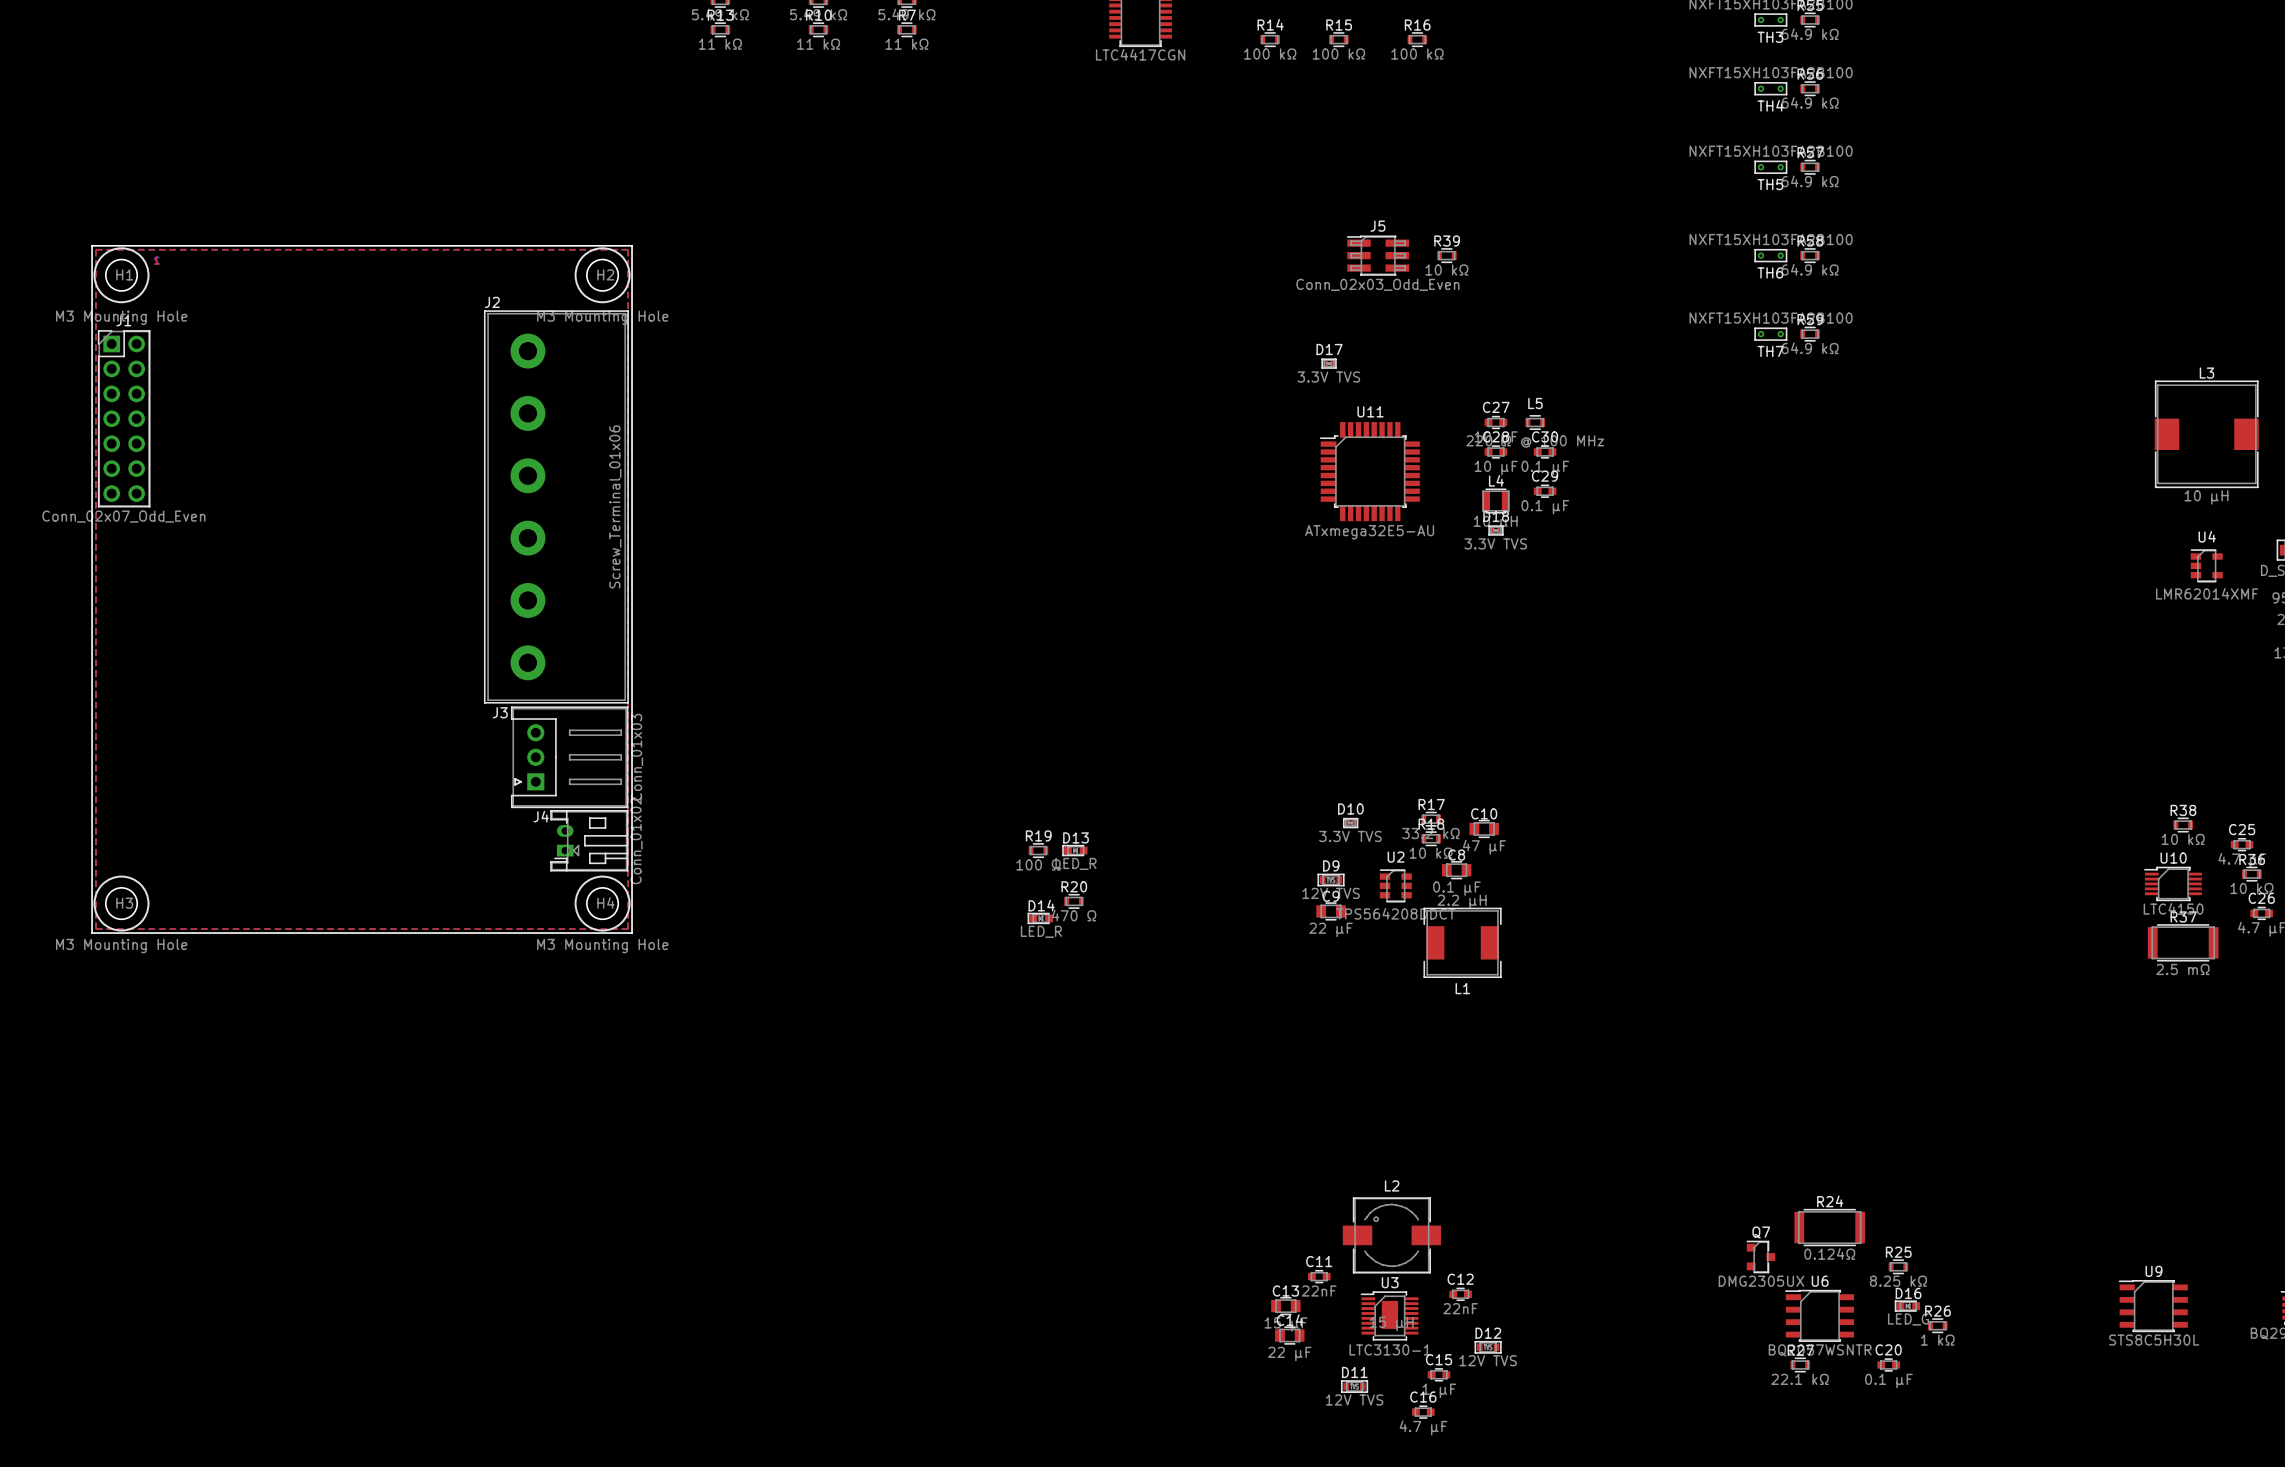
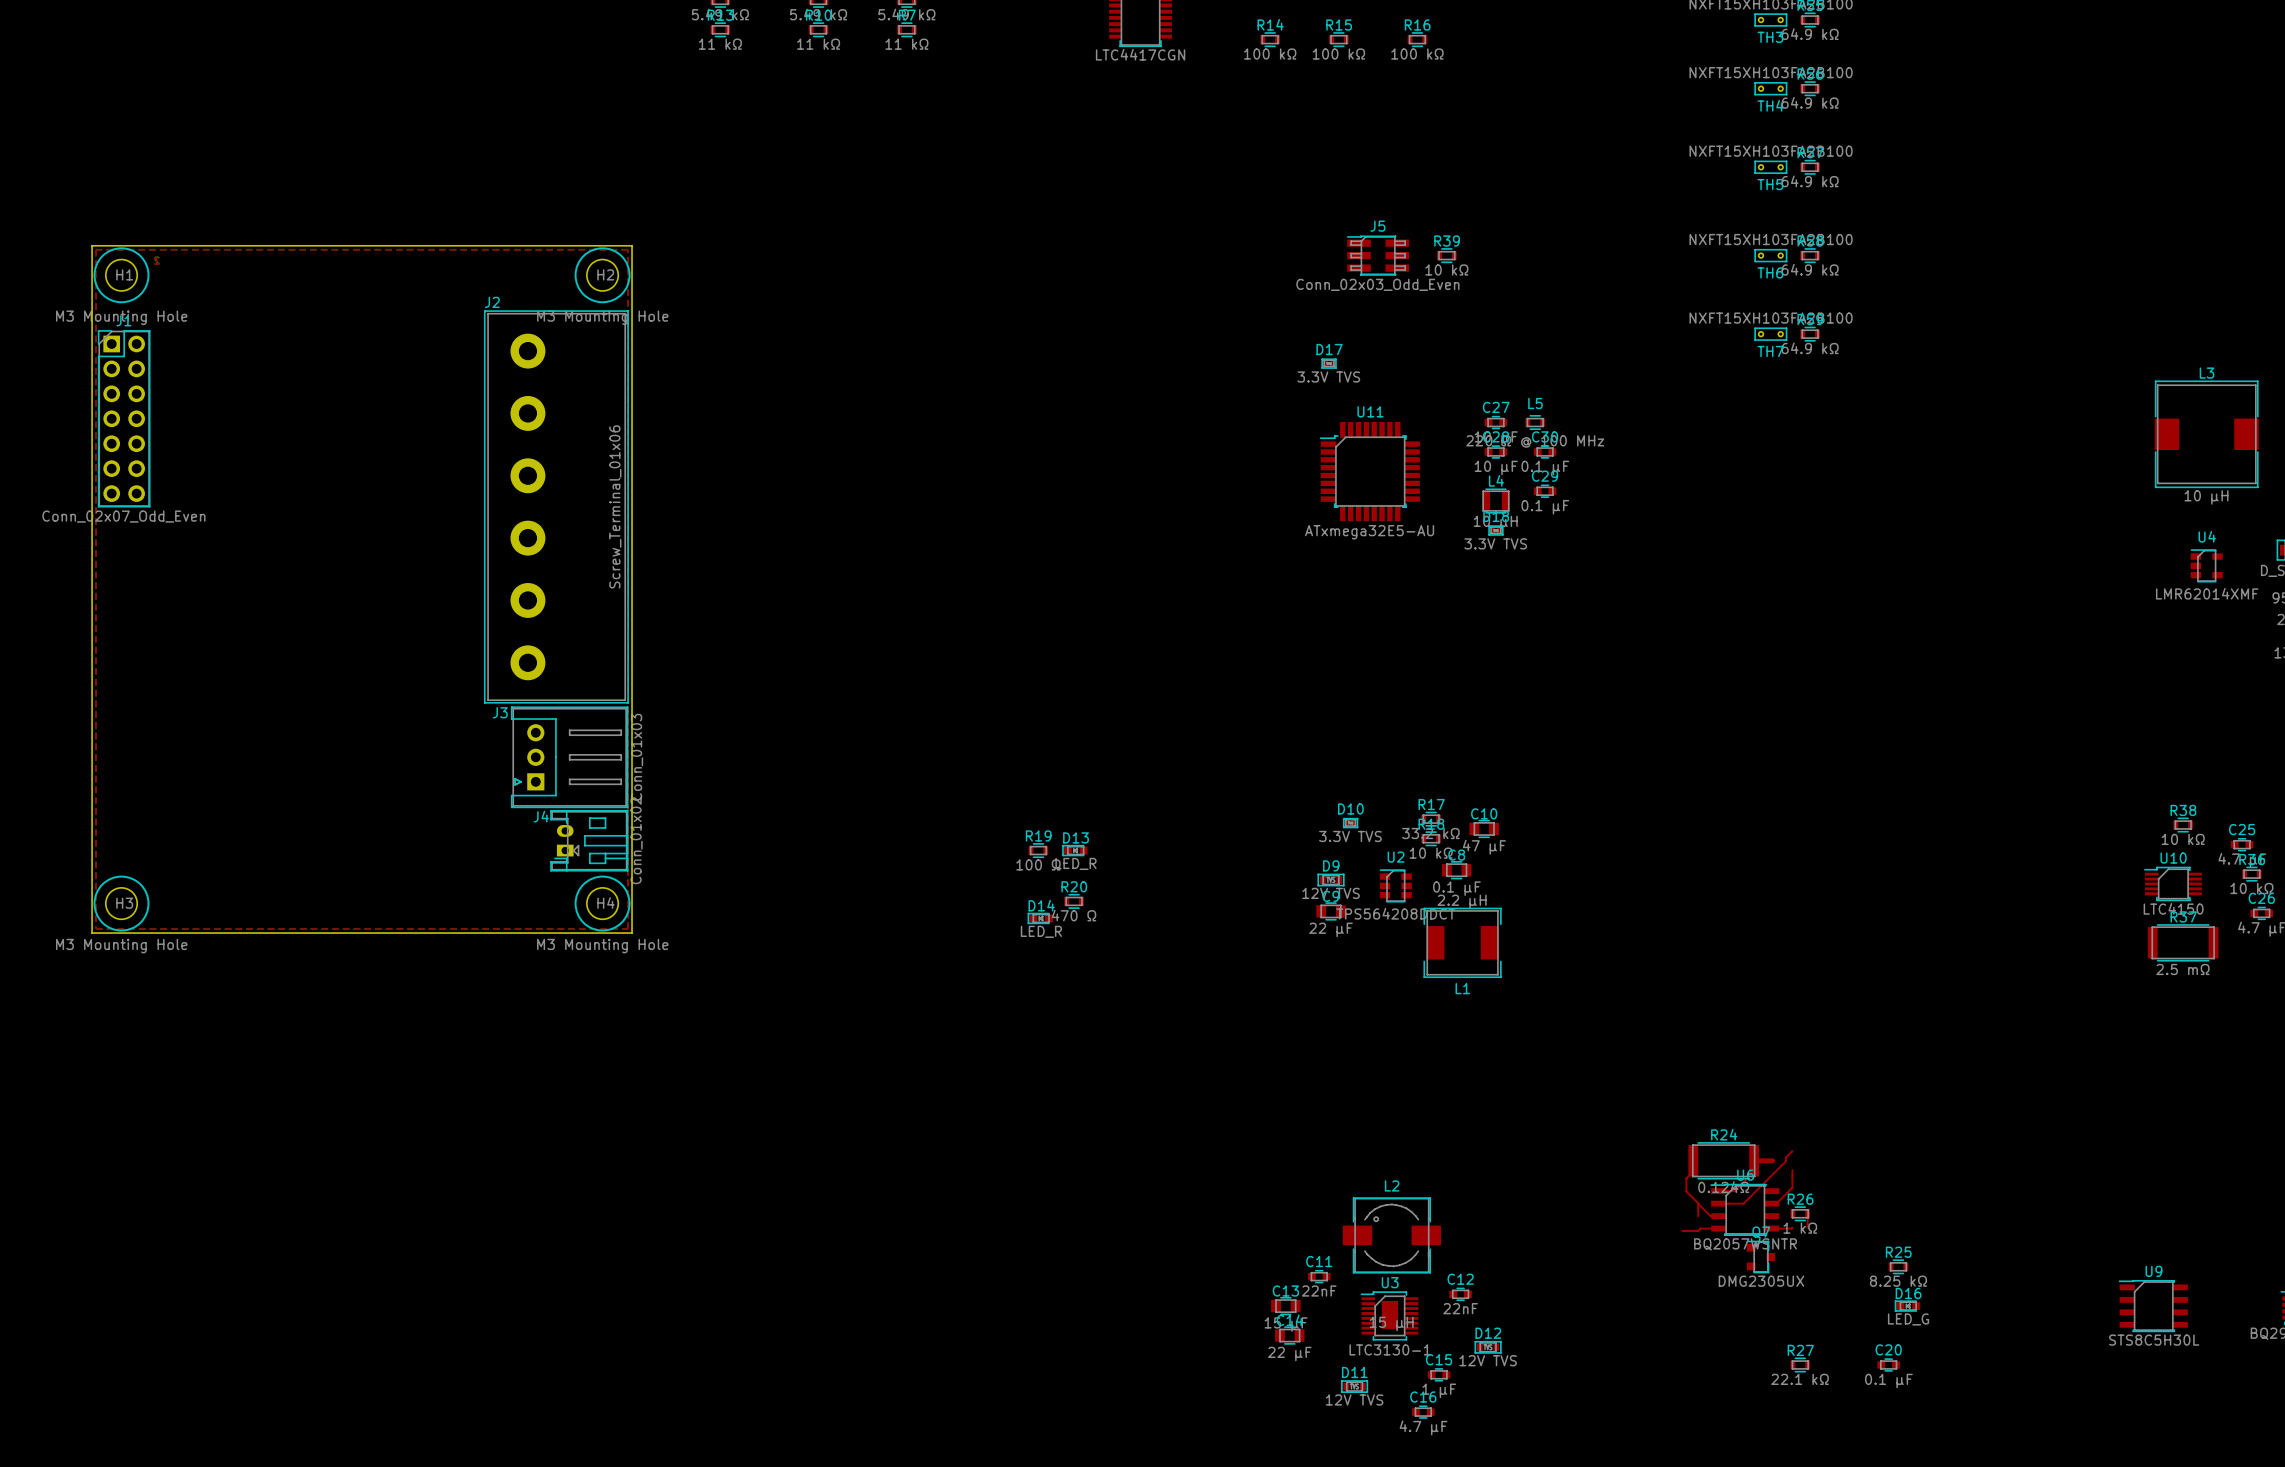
top track: none -> (1792, 1151) (1786, 1157) (1786, 1161) (1743, 1203) (1718, 1203)
top track: none -> (1693, 1160) (1693, 1171) (1686, 1178) (1686, 1191) (1698, 1203) (1698, 1216)
top track: none -> (1772, 1160) (1754, 1160) (1754, 1171) (1734, 1191) (1718, 1191)
top track: none -> (1792, 1170) (1792, 1187) (1776, 1203) (1771, 1203)
top track: none -> (1698, 1203) (1710, 1216) (1718, 1216)
top track: none -> (1807, 1213) (1808, 1227)
top track: none -> (1792, 1227) (1771, 1228)
R24 position: (1829, 1227) -> (1723, 1160)
top track: none -> (1718, 1228) (1682, 1230)
U6 position: (1819, 1315) -> (1744, 1209)
R26 position: (1937, 1325) -> (1800, 1213)

